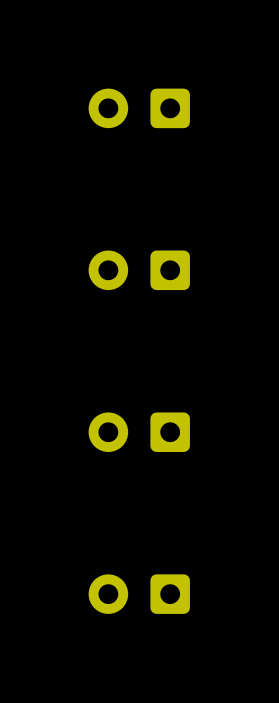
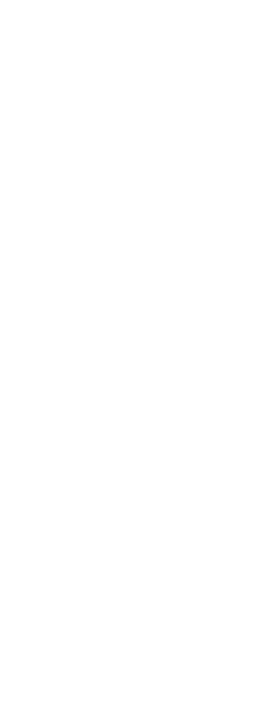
part: (139, 108) -> none
part: (139, 270) -> none
part: (139, 432) -> none
part: (139, 594) -> none

